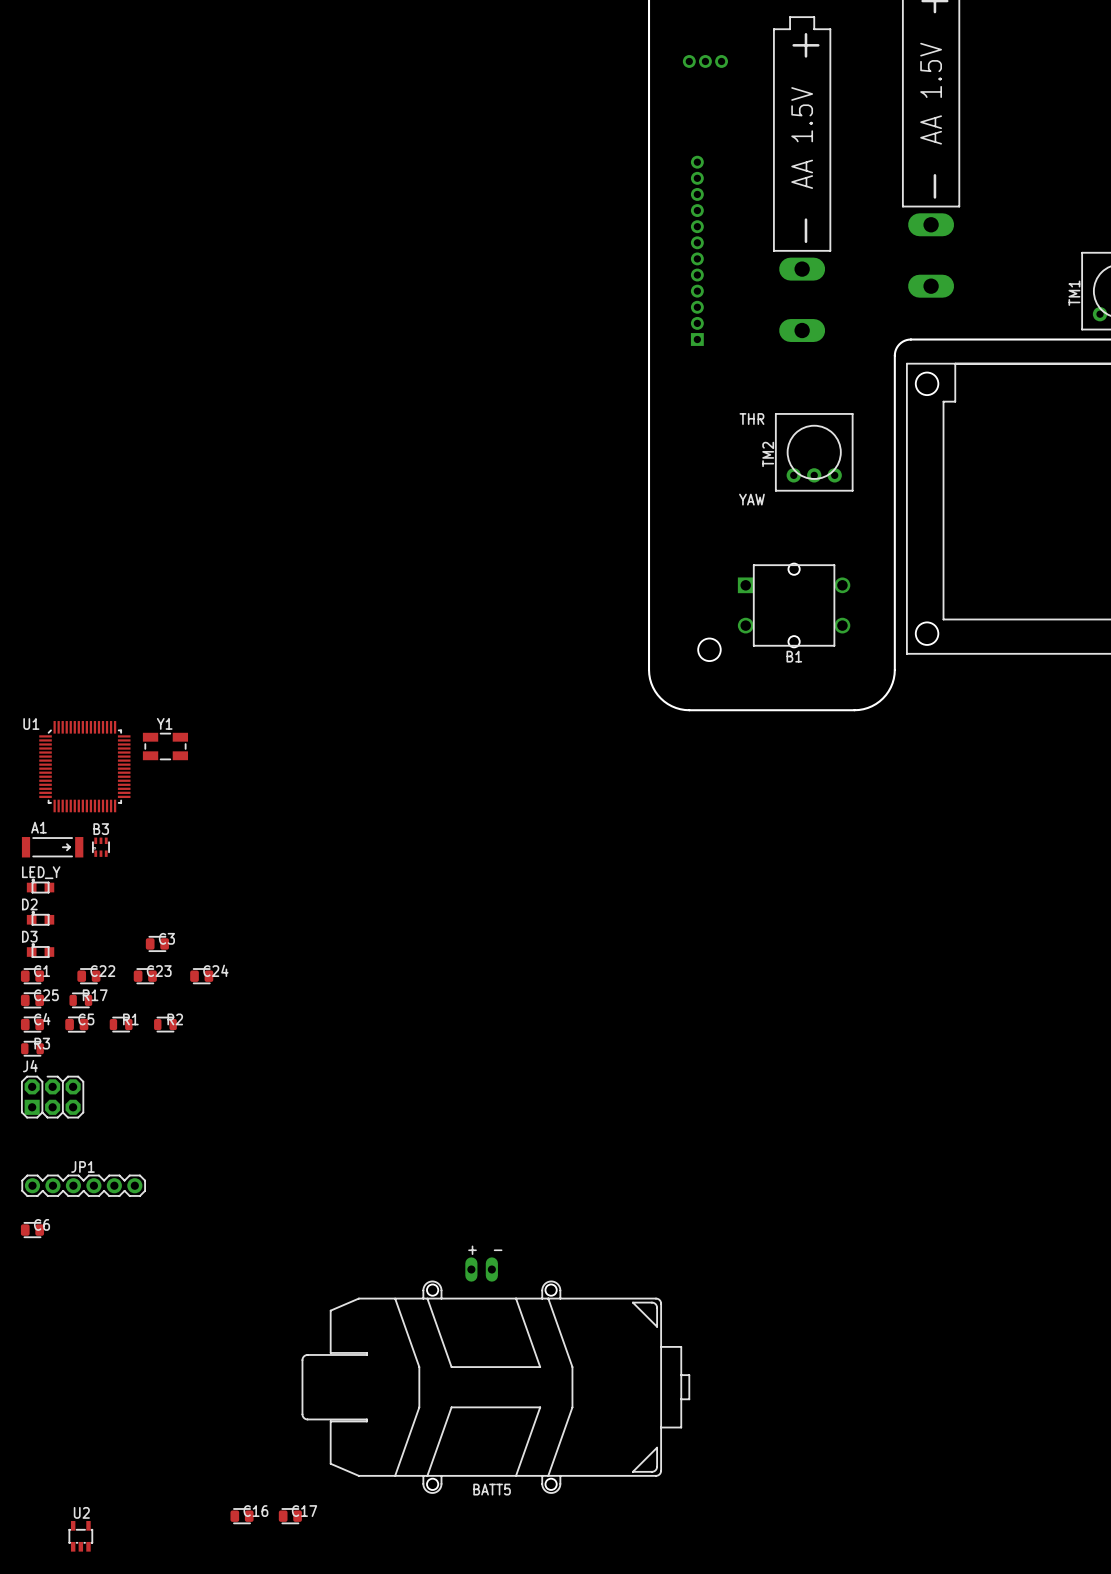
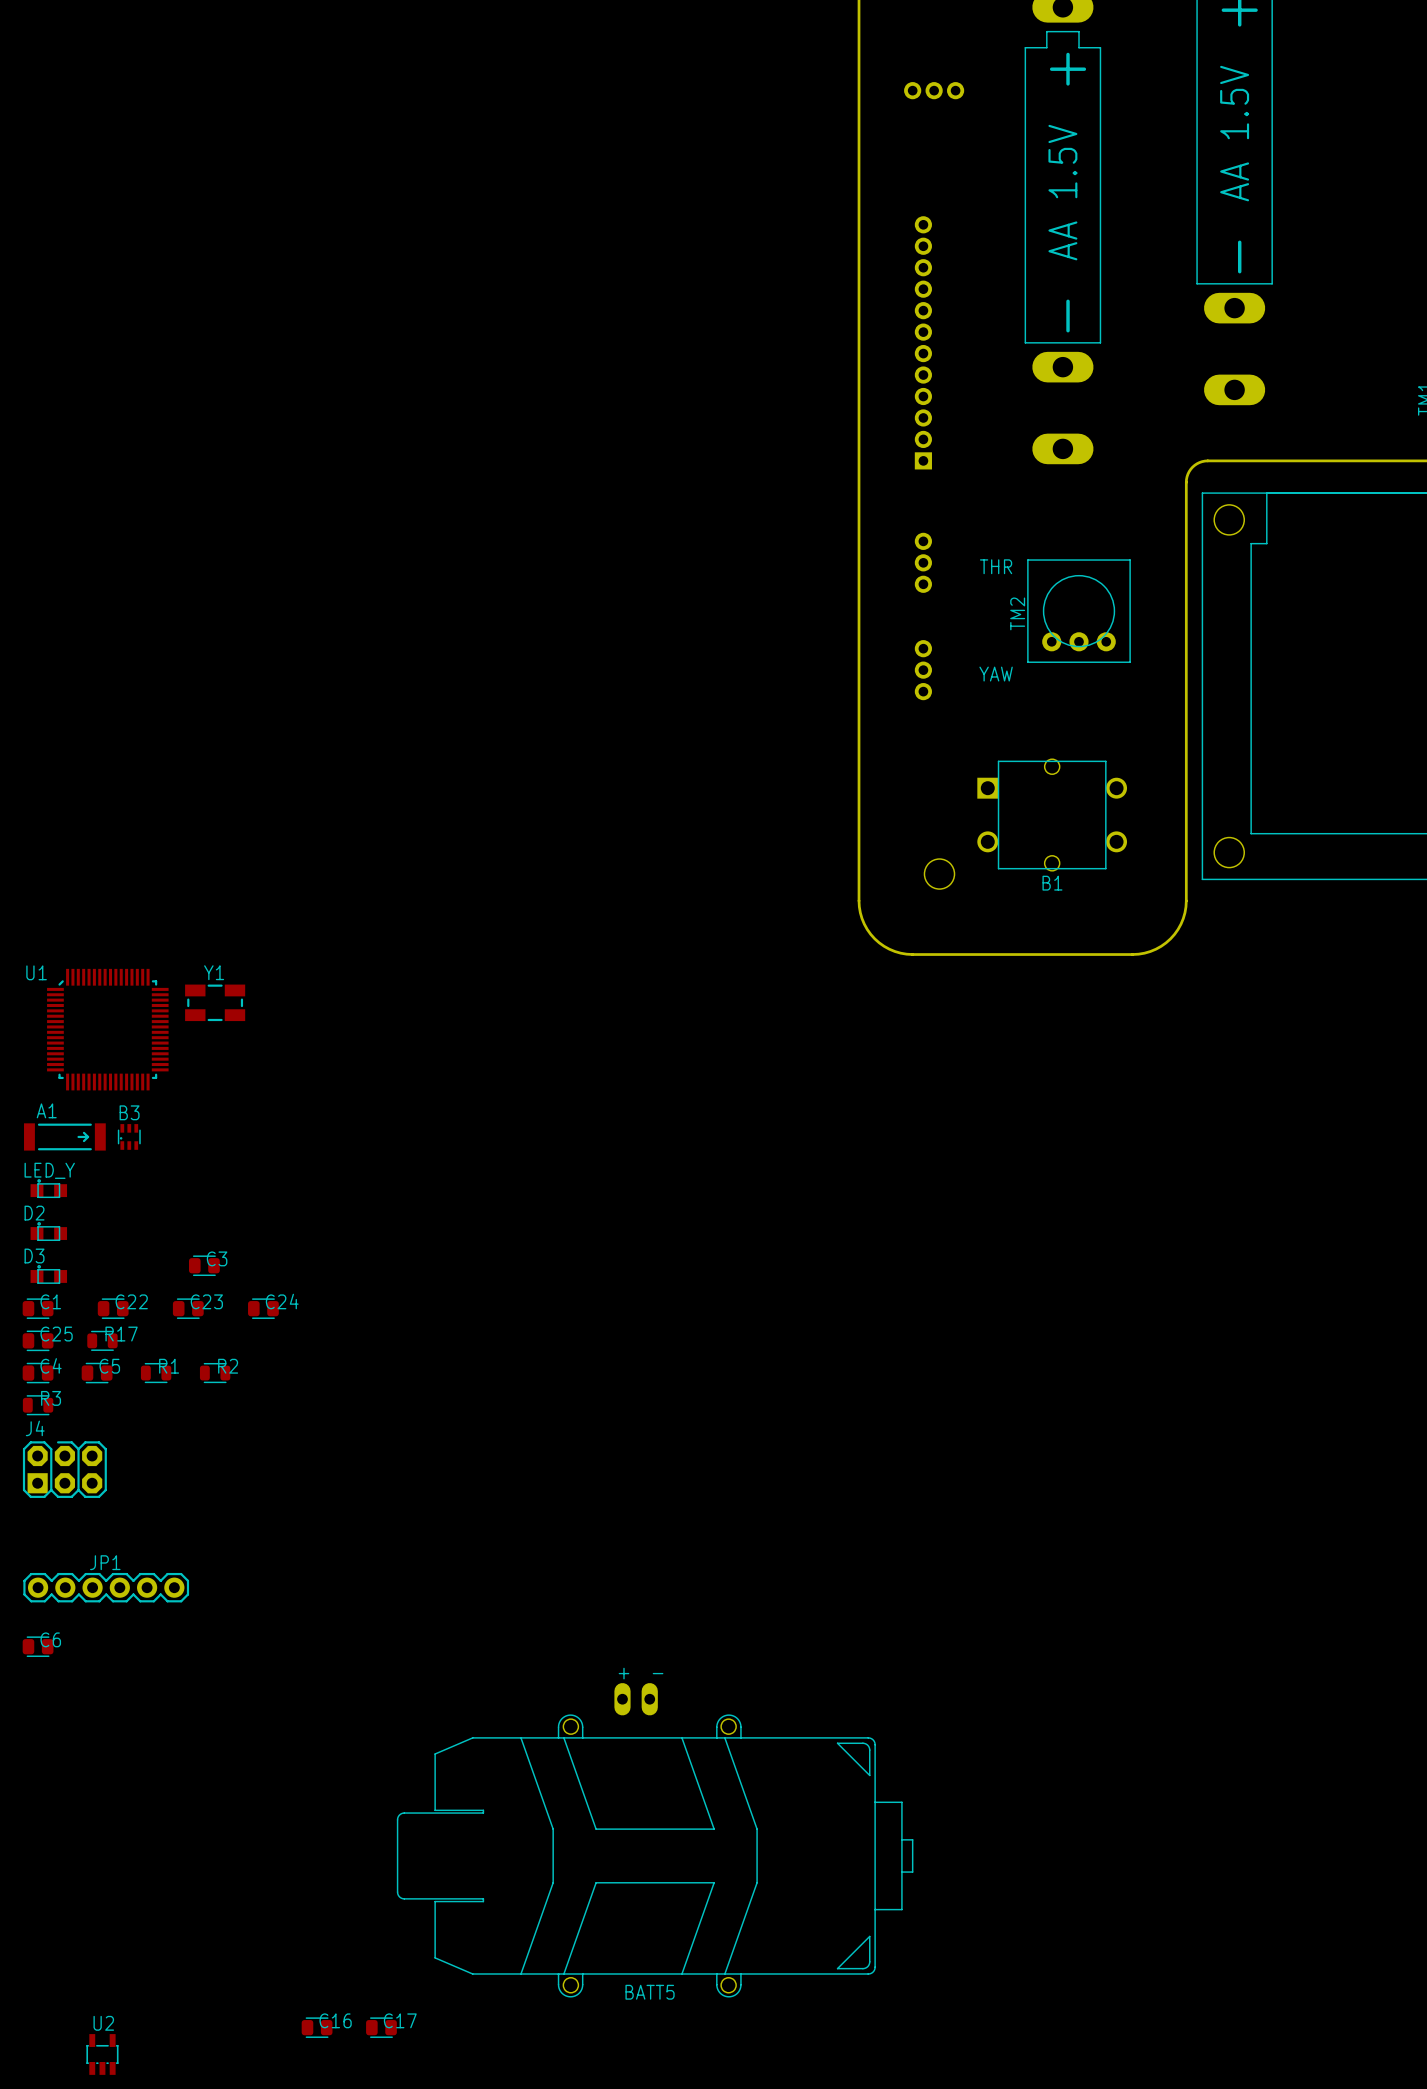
part: none -> (923, 562)
part: none -> (923, 670)

